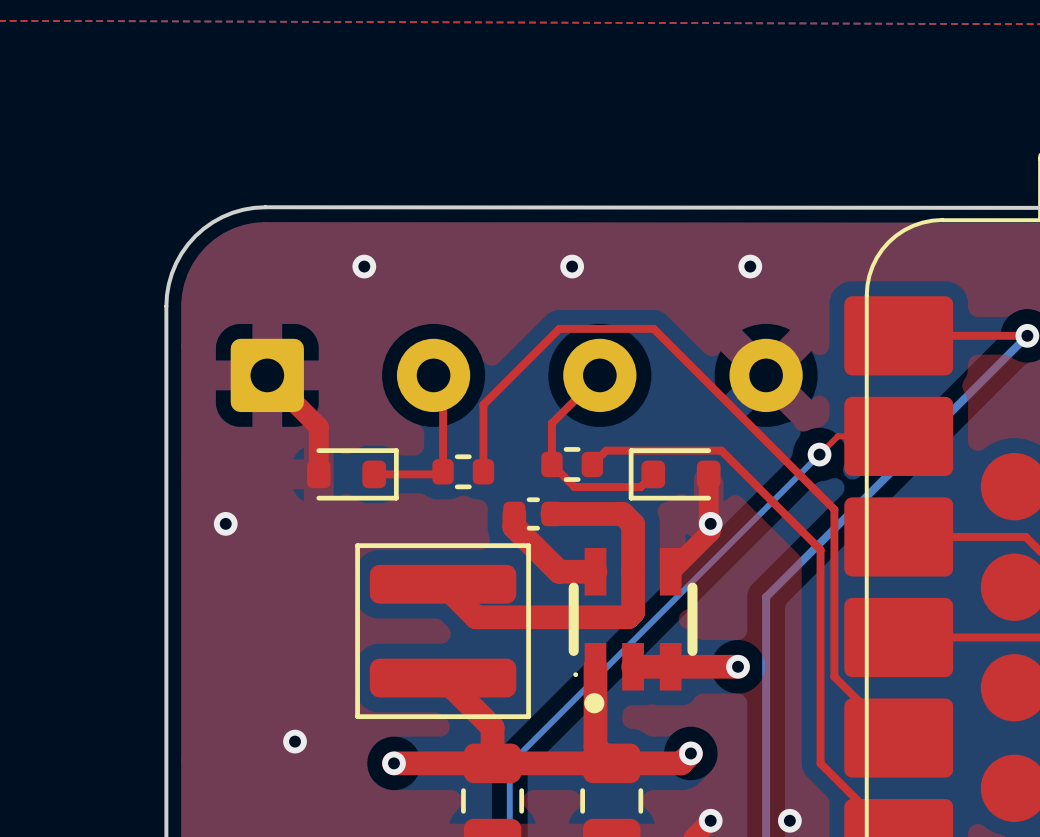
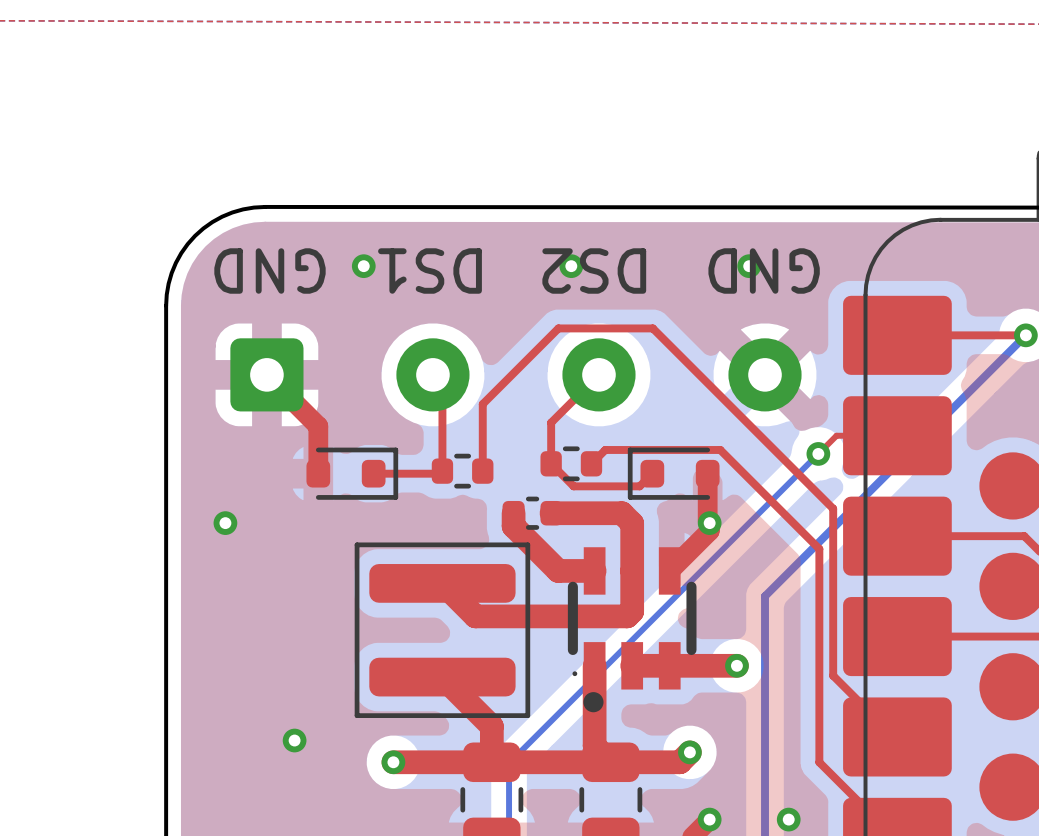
text: none -> GND (269, 271)
text: none -> DS1 (429, 271)
text: none -> DS2 (594, 271)
text: none -> GND (764, 271)

